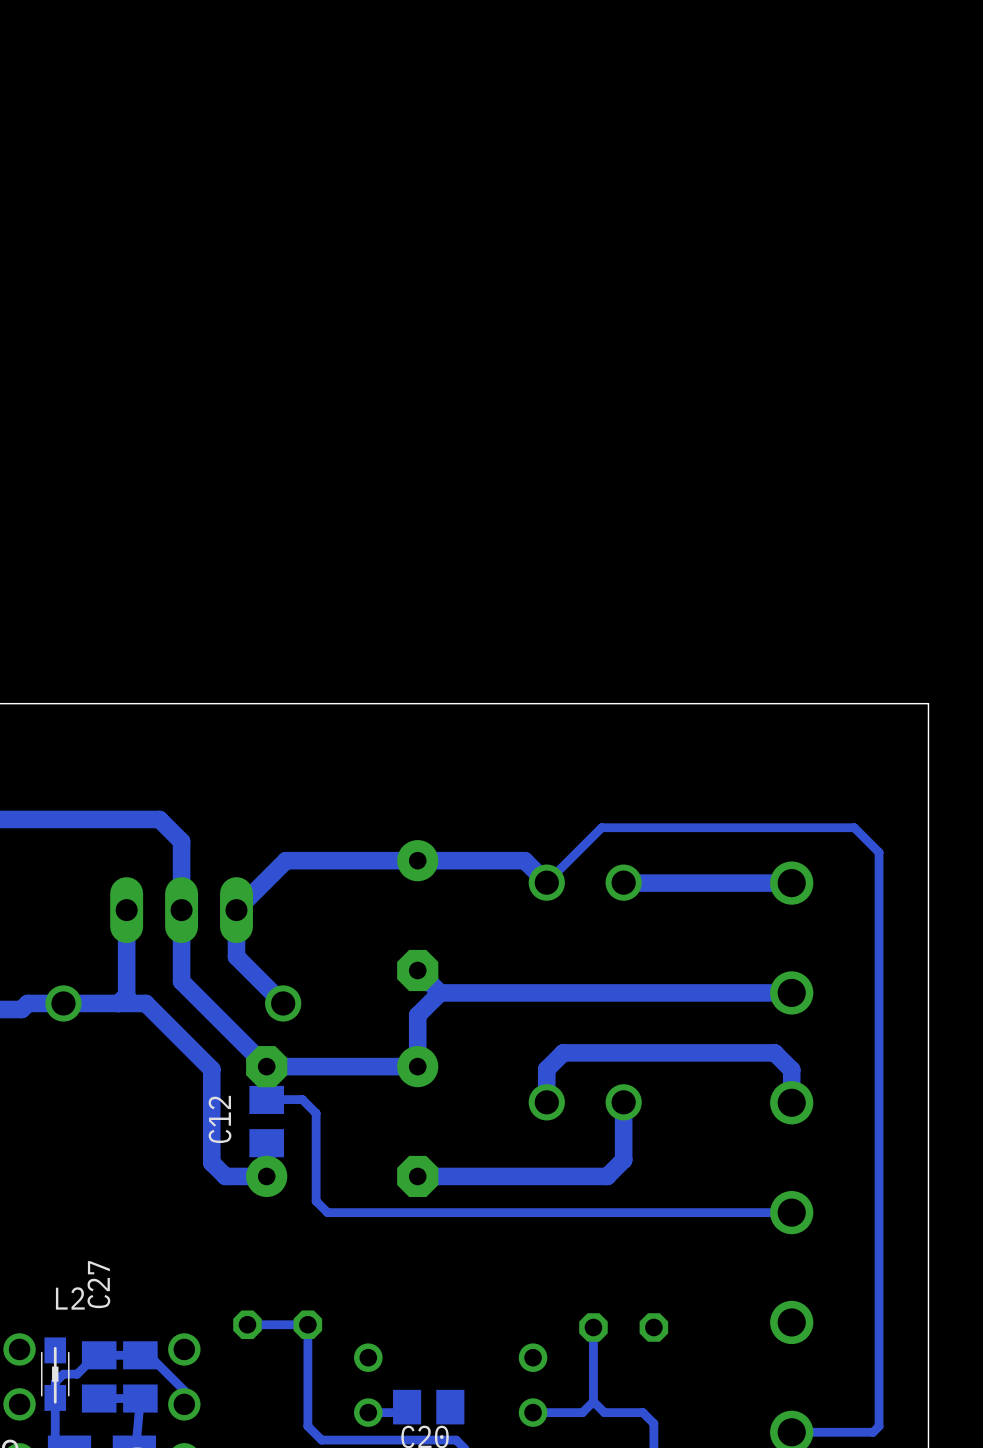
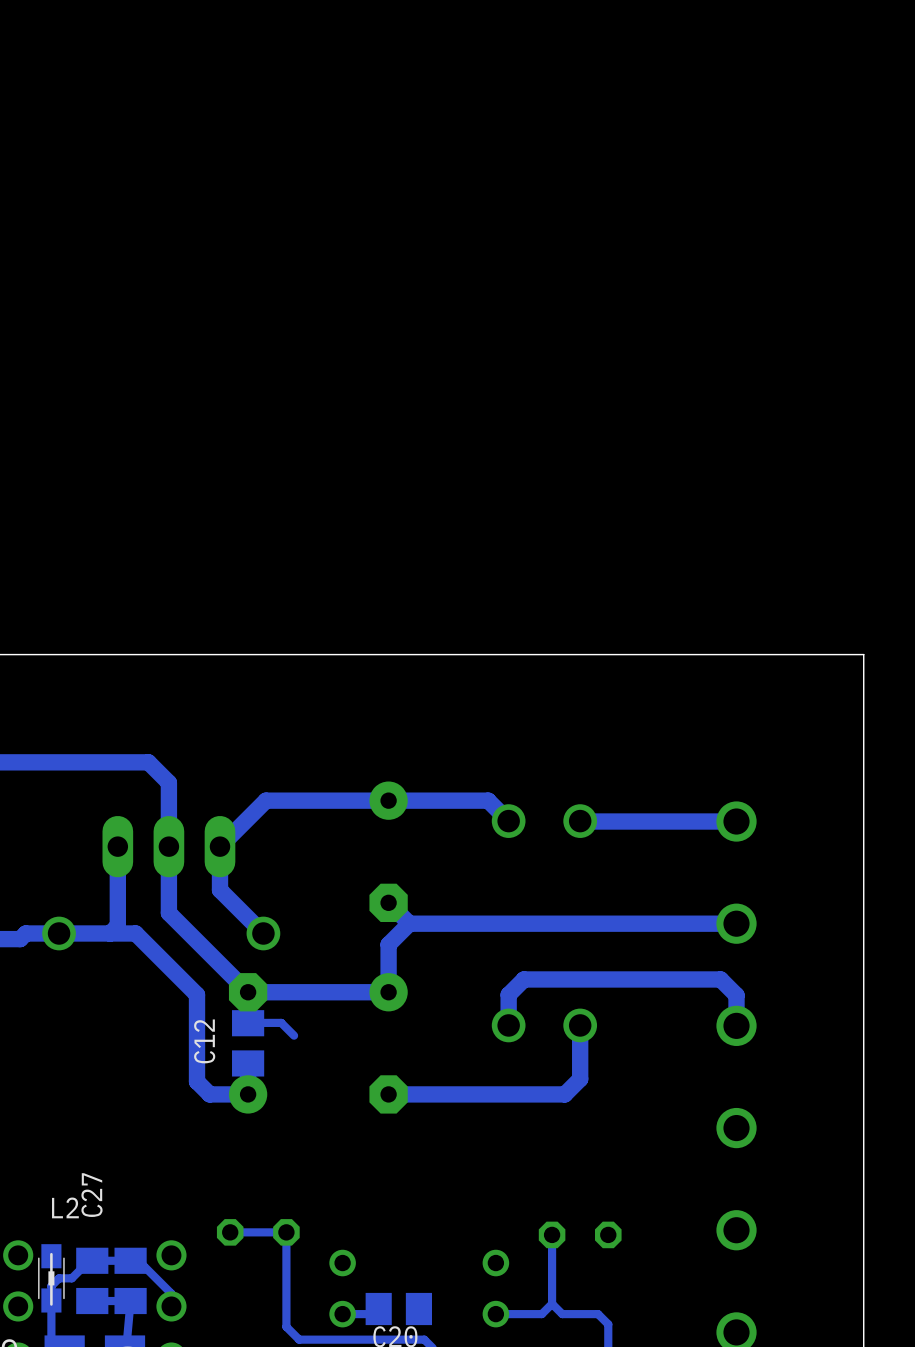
track: (546, 882) (601, 827) (854, 827) (879, 852) (879, 1426) (873, 1432) (791, 1432) -> none
track: (316, 1113) (316, 1201) (327, 1212) (791, 1212) -> none

